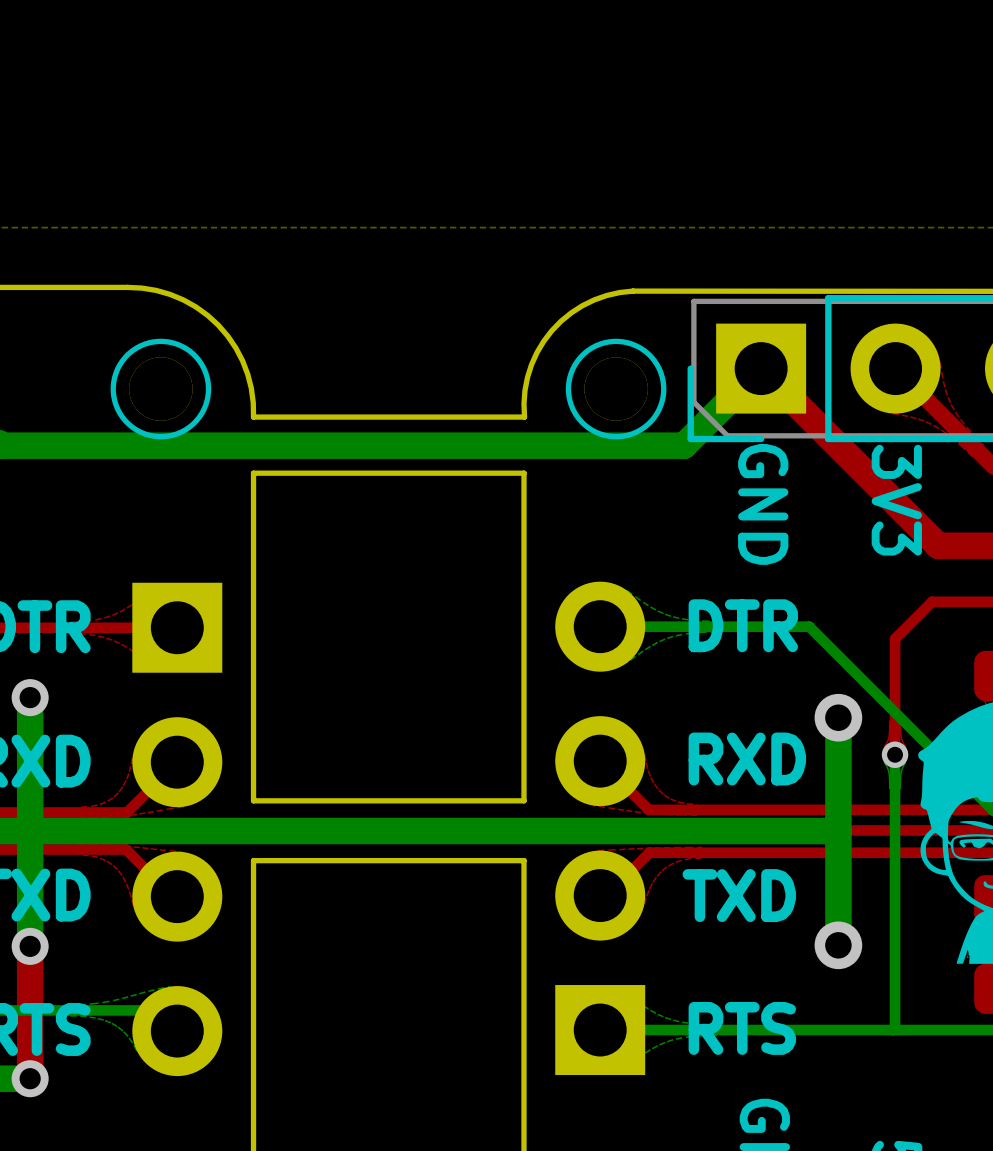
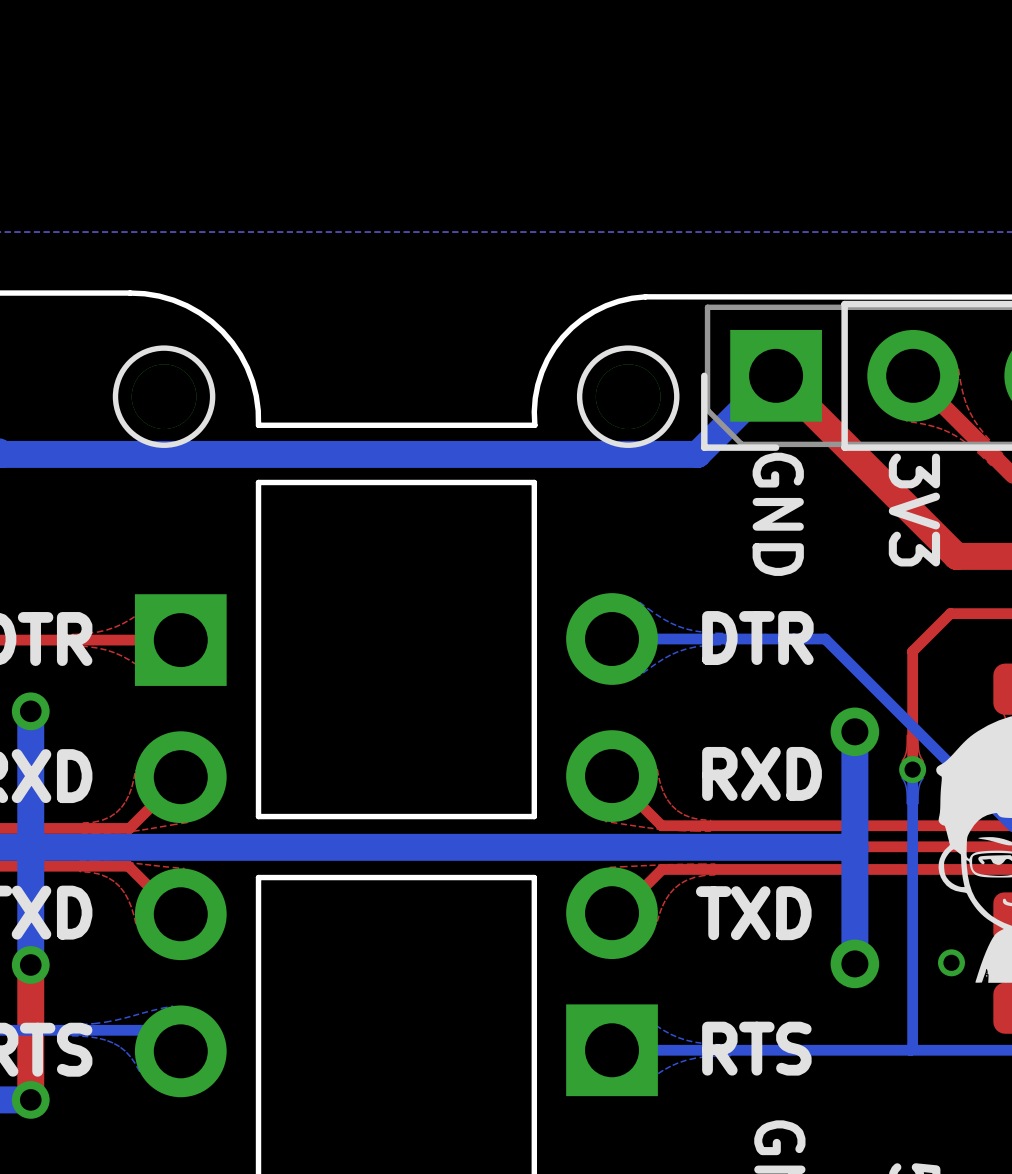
via: none -> (951, 962)

